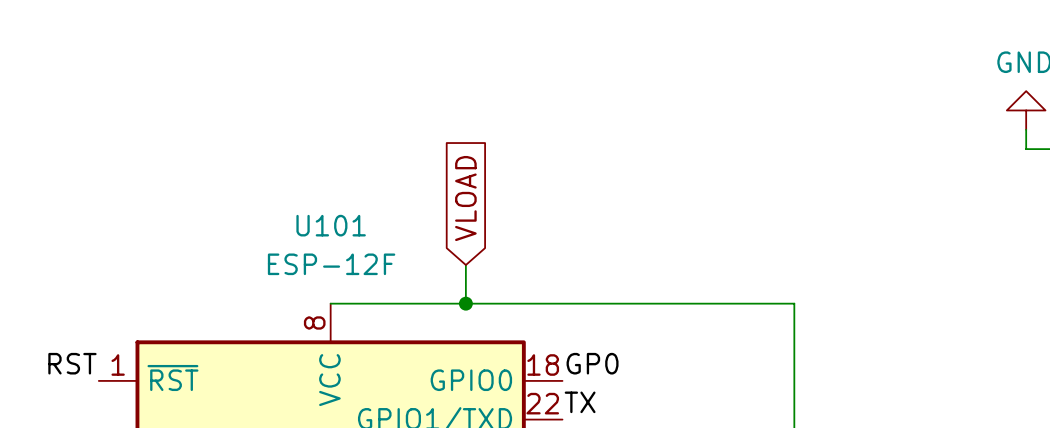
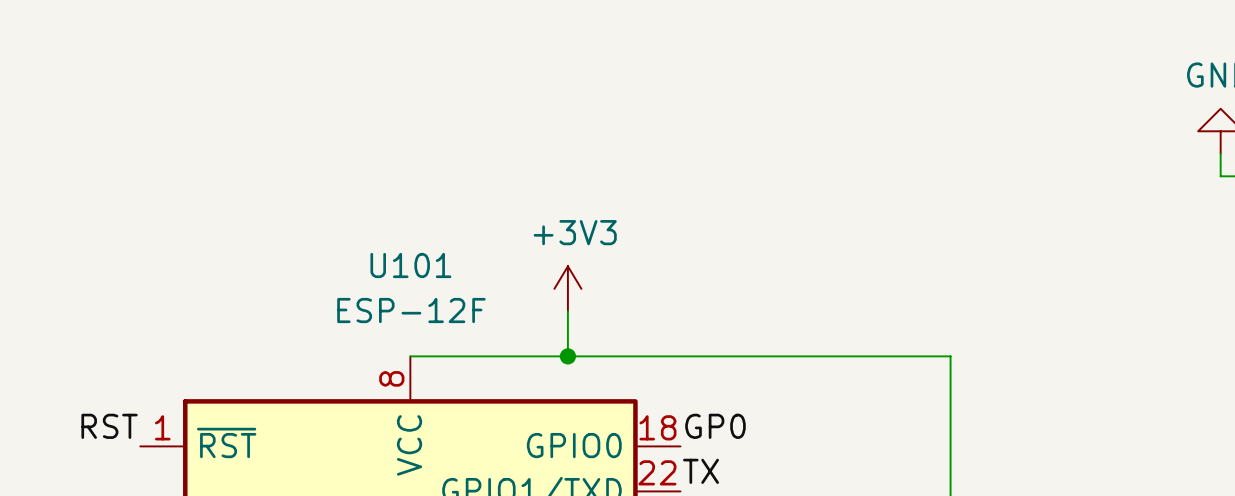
global label: VLOAD (465, 198) -> none
power symbol: none -> +3V3 (567, 288)

